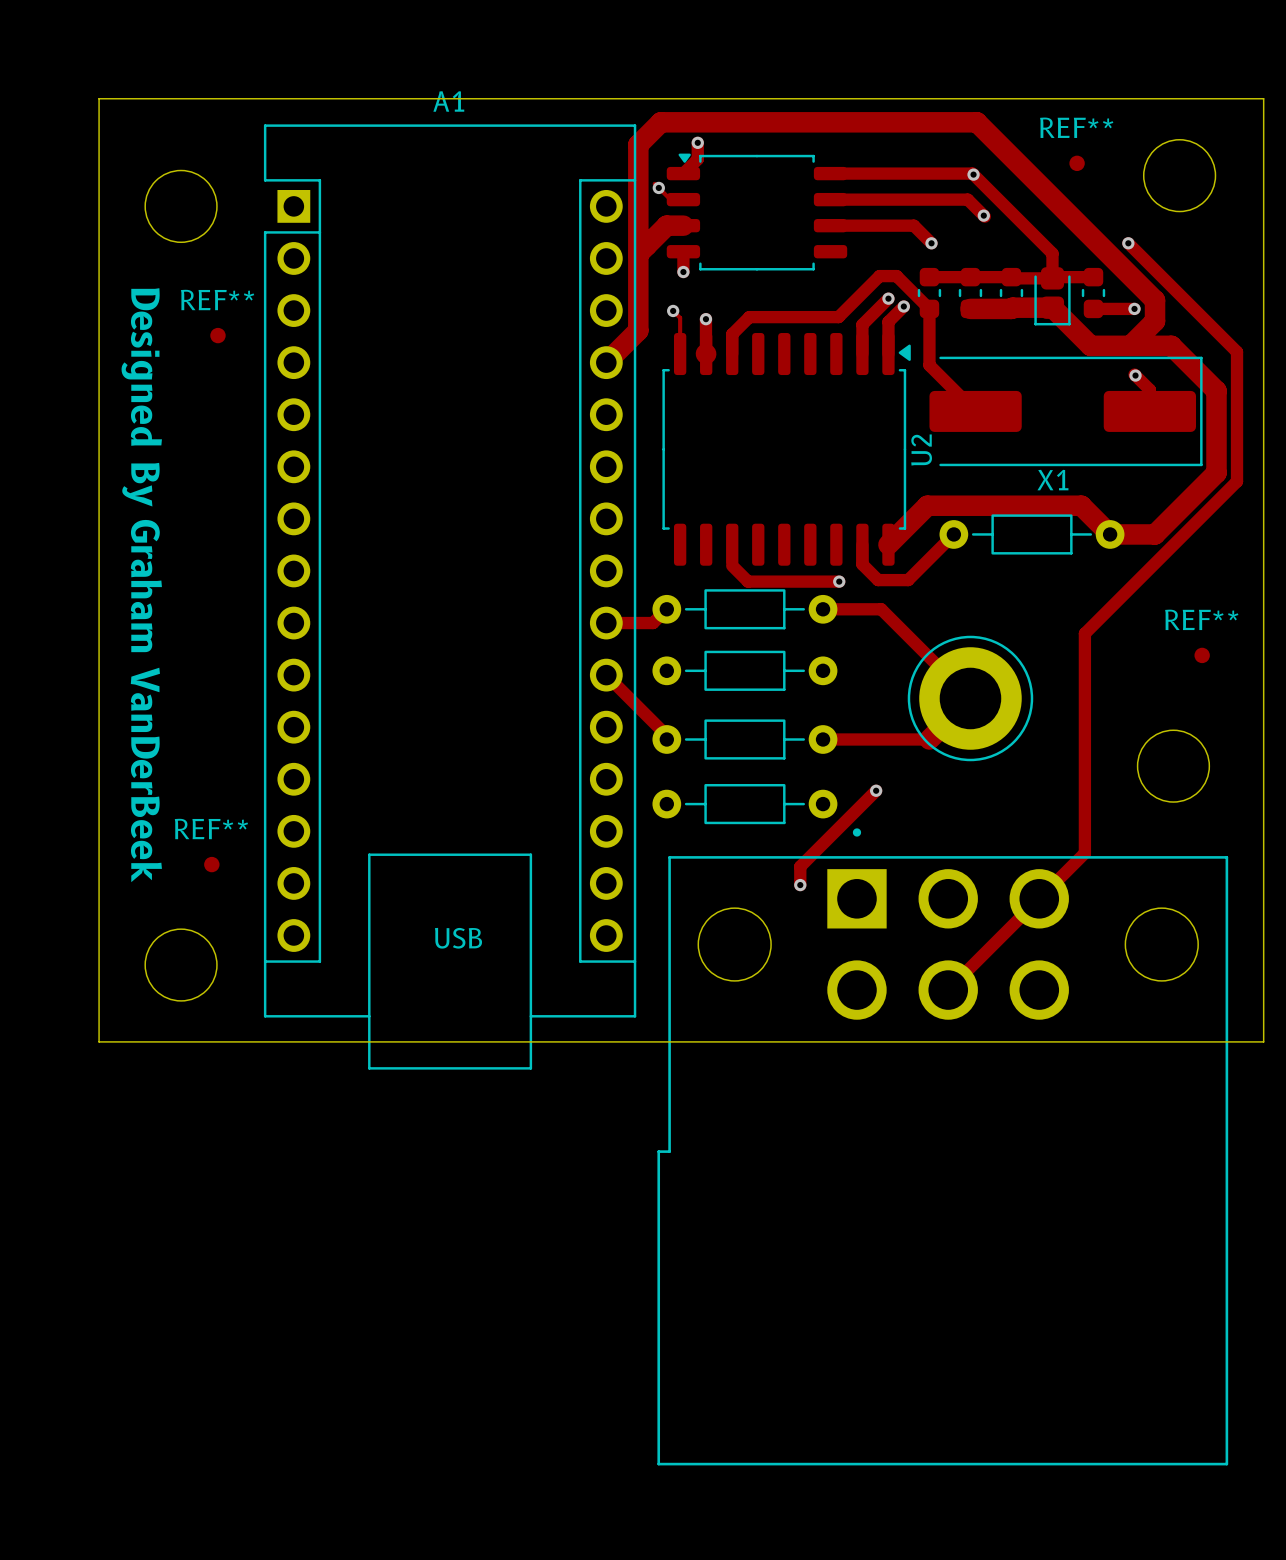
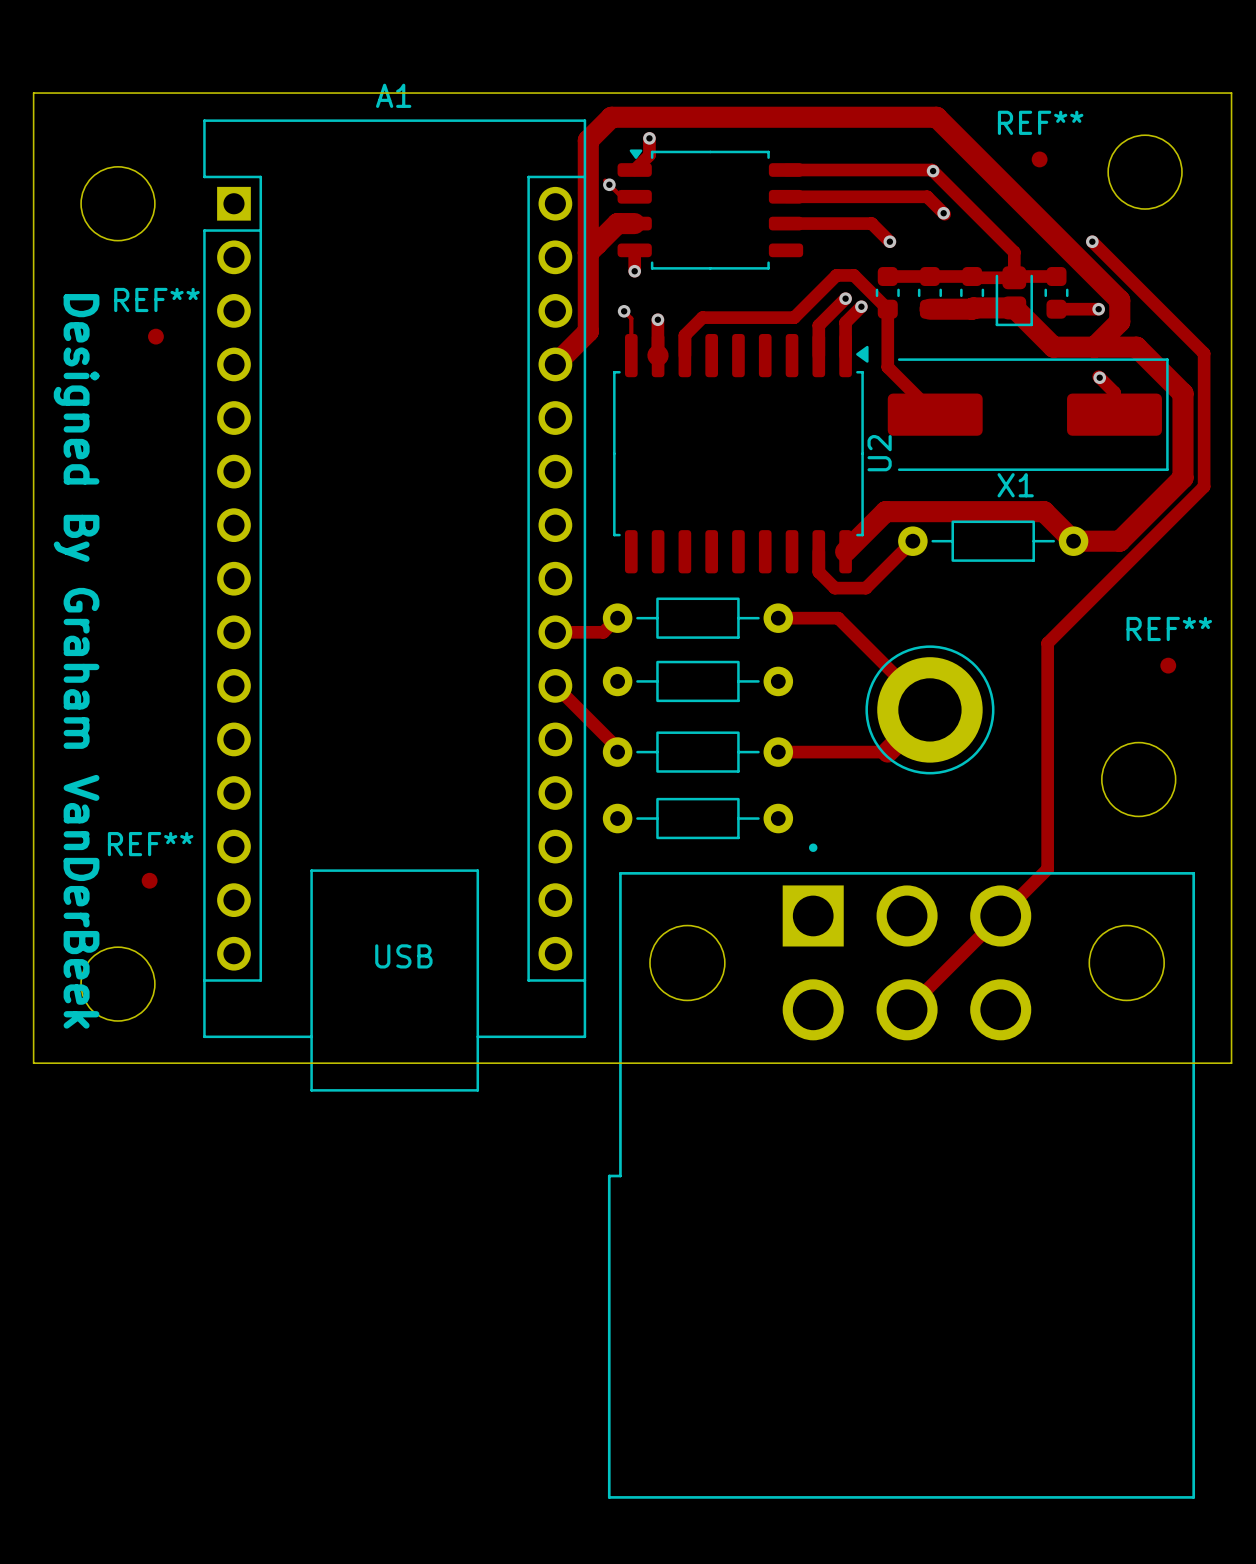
track: (732, 544) (732, 565) (748, 581) (839, 581) -> none
via: (839, 581) -> none
track: (876, 790) (800, 866) (800, 885) -> none
via: (876, 790) -> none
via: (800, 885) -> none

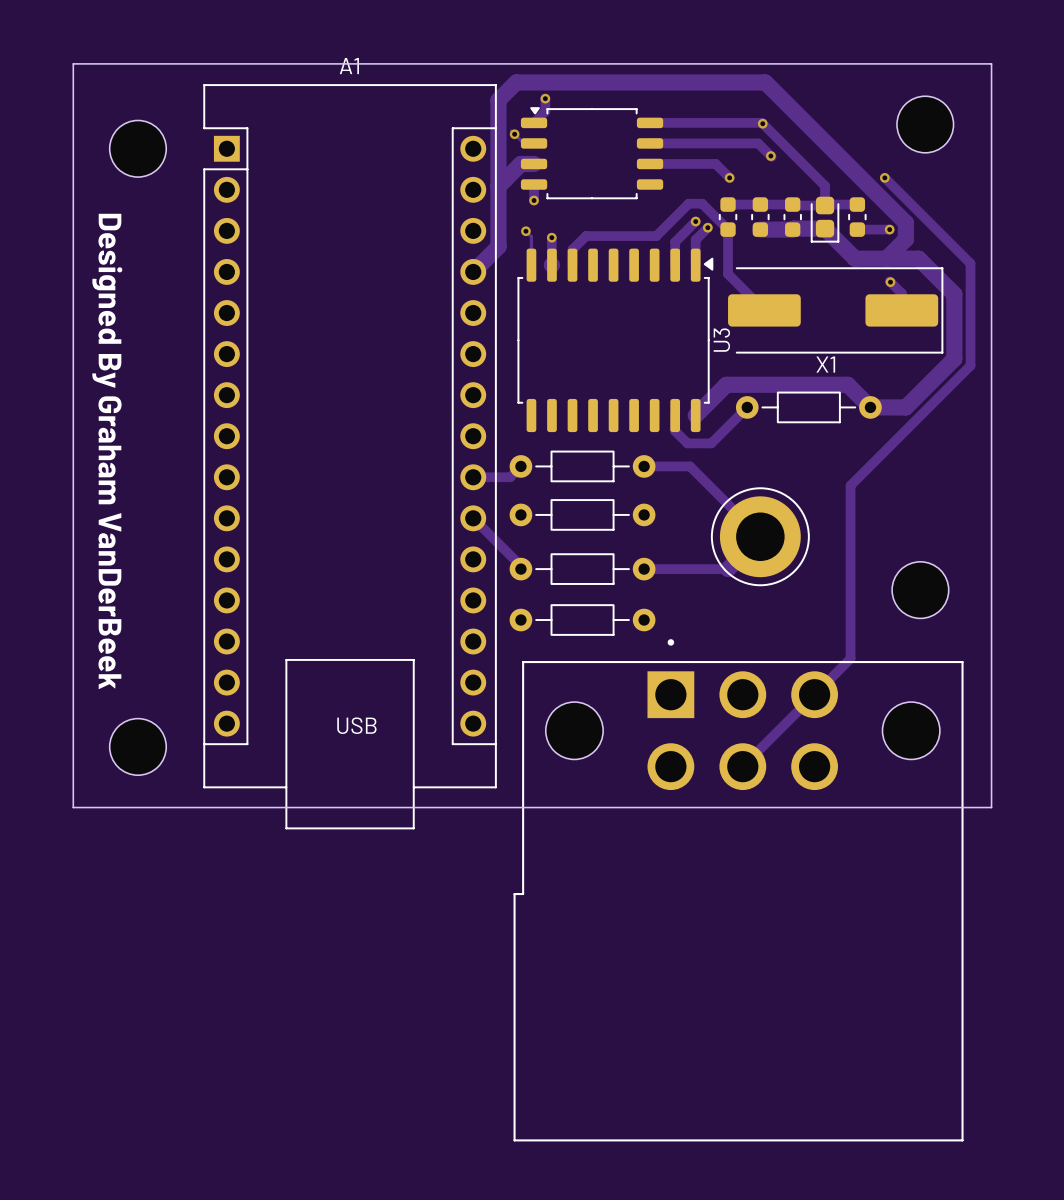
REF**: (1039, 159) -> none
REF**: (155, 336) -> none
U2 name: U2 (879, 453) -> U3 (721, 340)
REF**: (1168, 665) -> none
REF**: (149, 880) -> none

